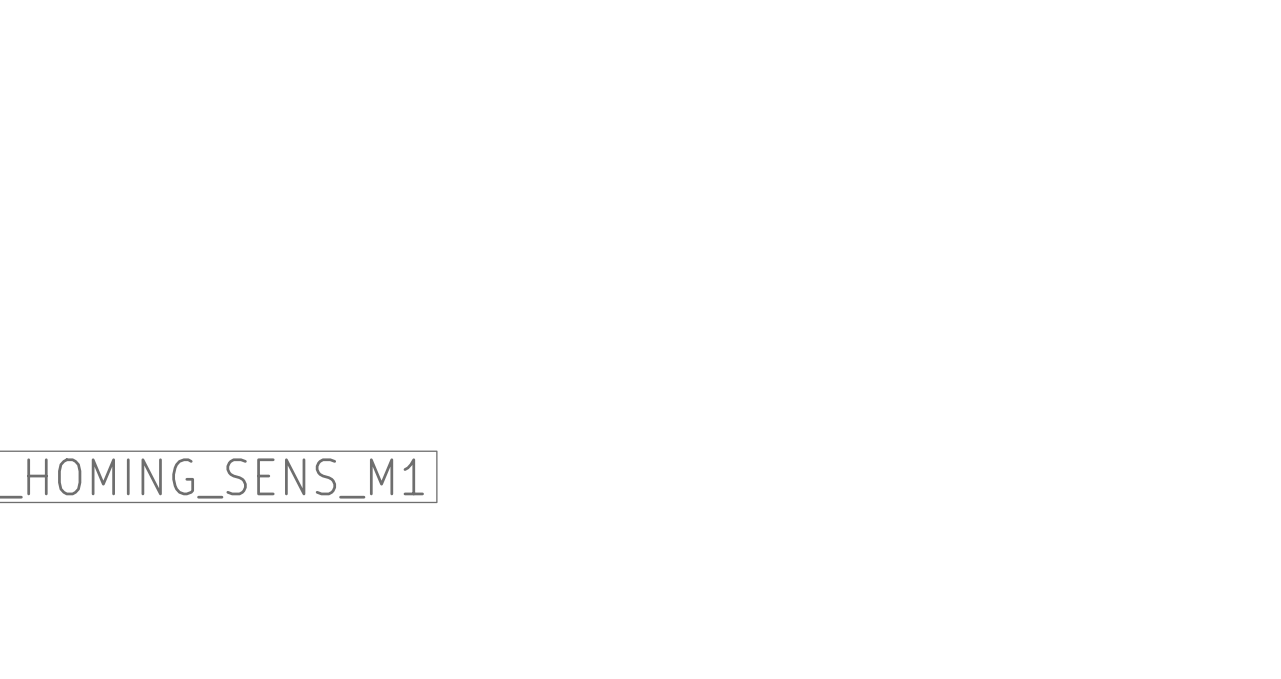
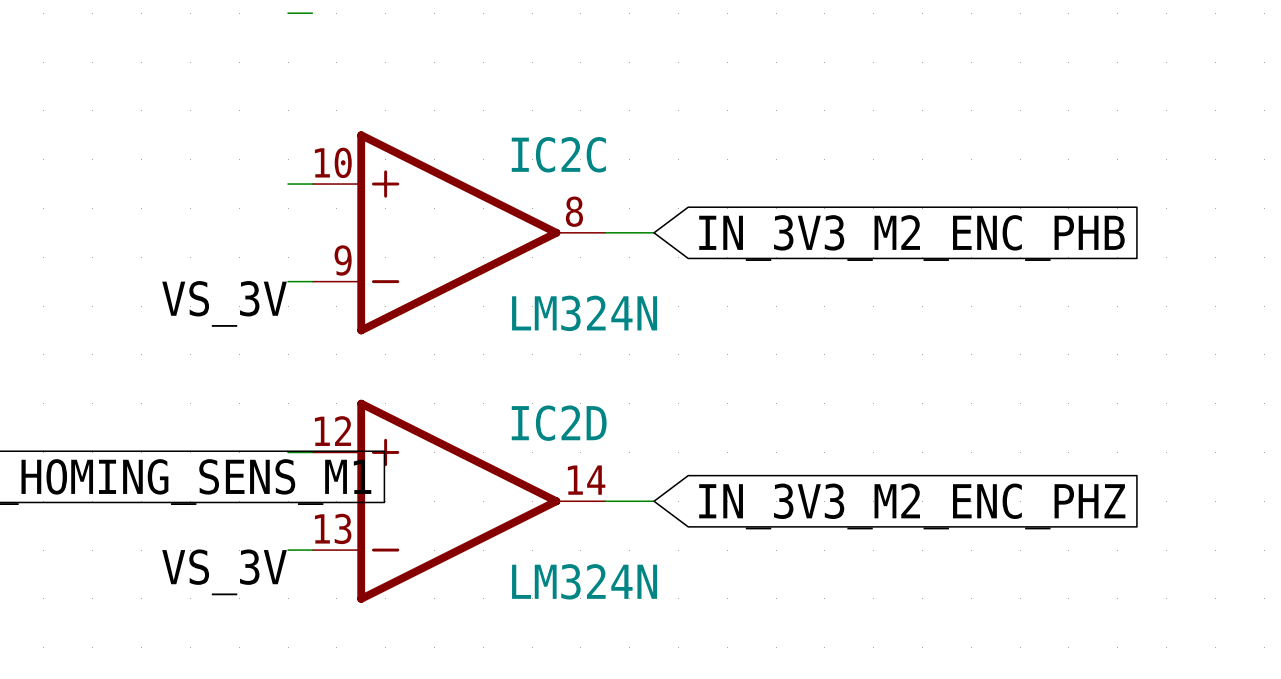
wire: none -> (288, 13) (312, 13)
wire: none -> (288, 184) (312, 184)
IC2C: none -> LM324N (458, 232)
wire: none -> (605, 232) (654, 232)
global label: none -> IN_3V3_M2_ENC_PHB (911, 238)
wire: none -> (288, 281) (312, 281)
label: none -> VS_3V (224, 303)
wire: none -> (288, 452) (312, 452)
IC2D: none -> LM324N (458, 501)
wire: none -> (605, 501) (654, 501)
global label: none -> IN_3V3_M2_ENC_PHZ (912, 506)
wire: none -> (288, 550) (312, 550)
label: none -> VS_3V (224, 572)

